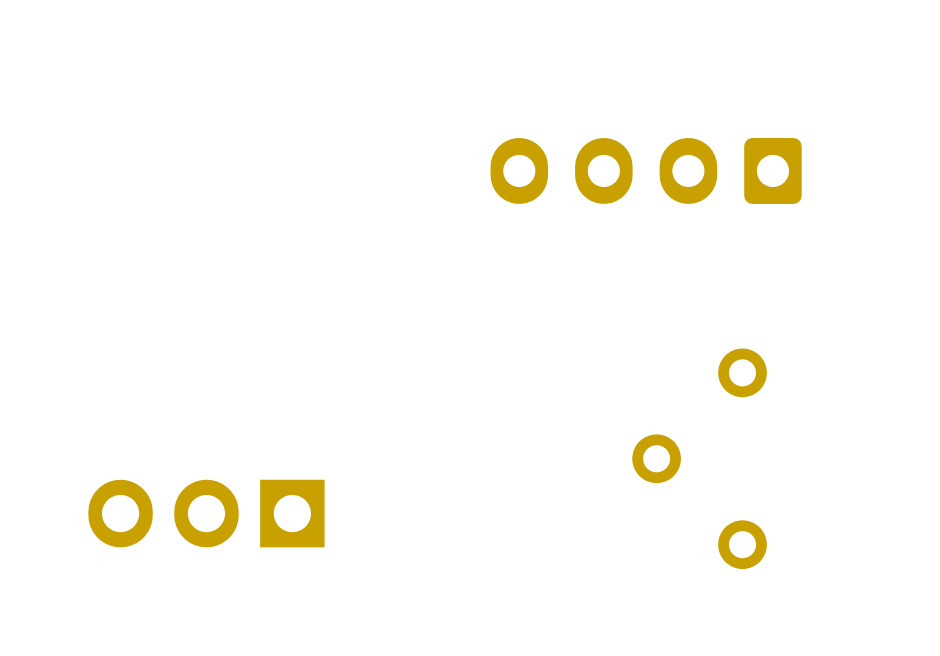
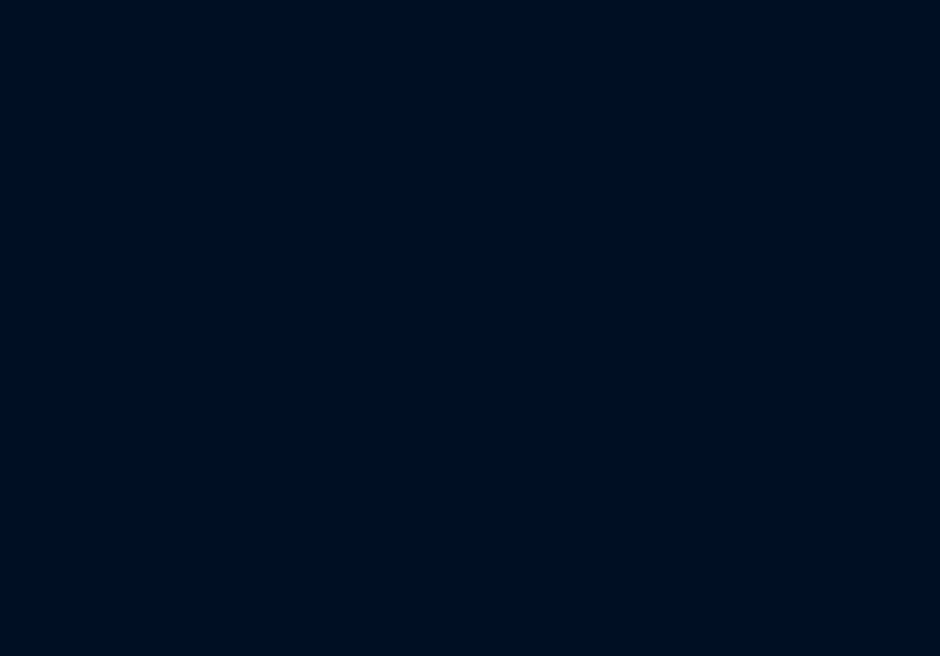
part: (646, 170) -> none
part: (699, 458) -> none
part: (206, 513) -> none

